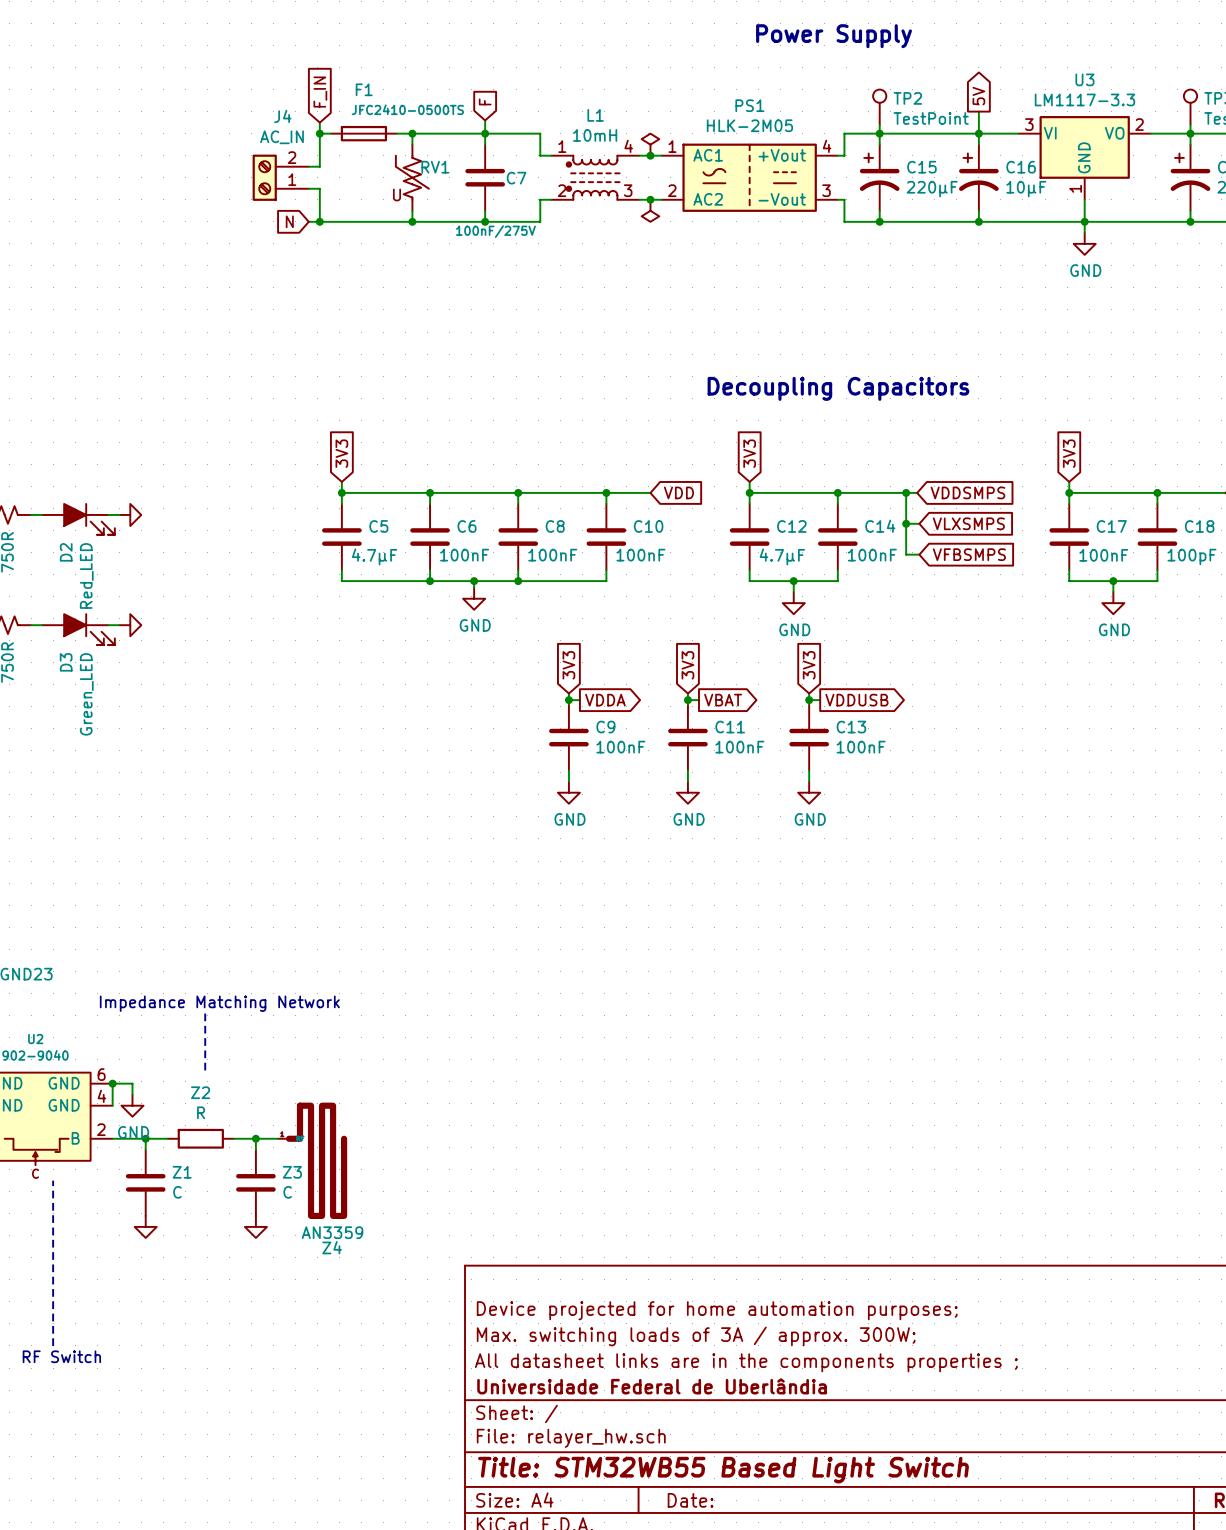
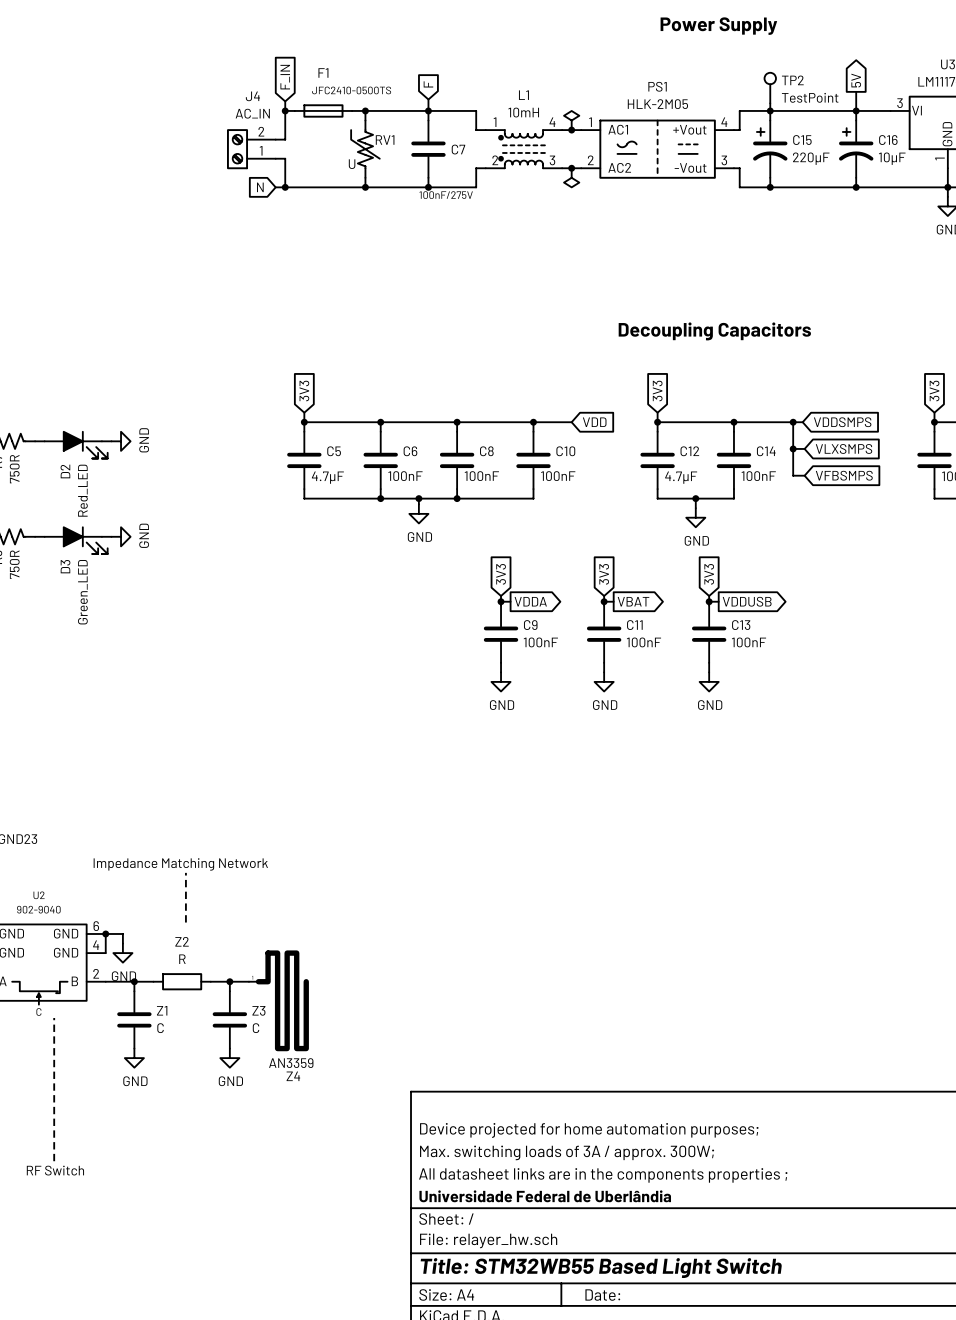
power symbol text: none -> GND (144, 440)
power symbol text: none -> GND (144, 535)
power symbol text: none -> GND (135, 1081)
power symbol text: none -> GND (230, 1081)

